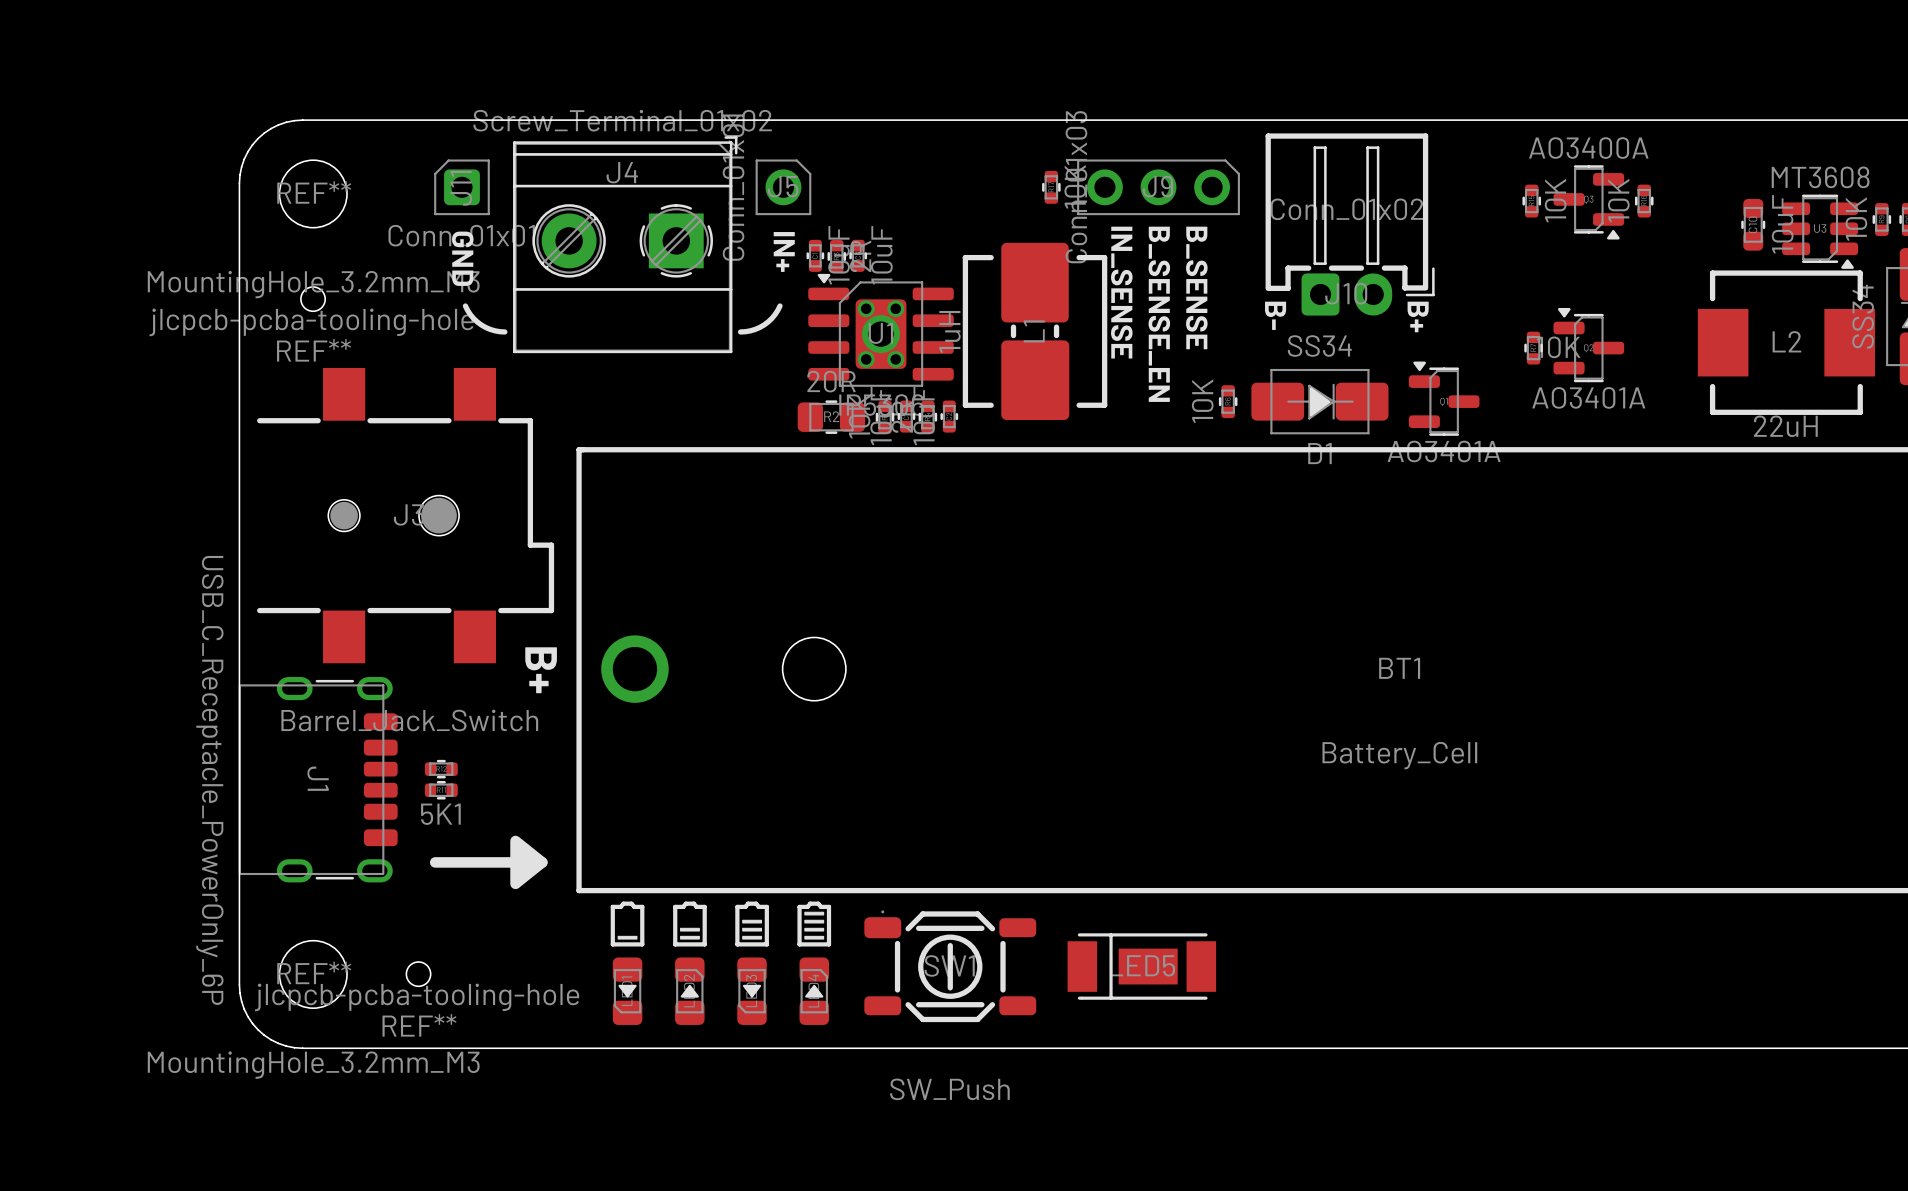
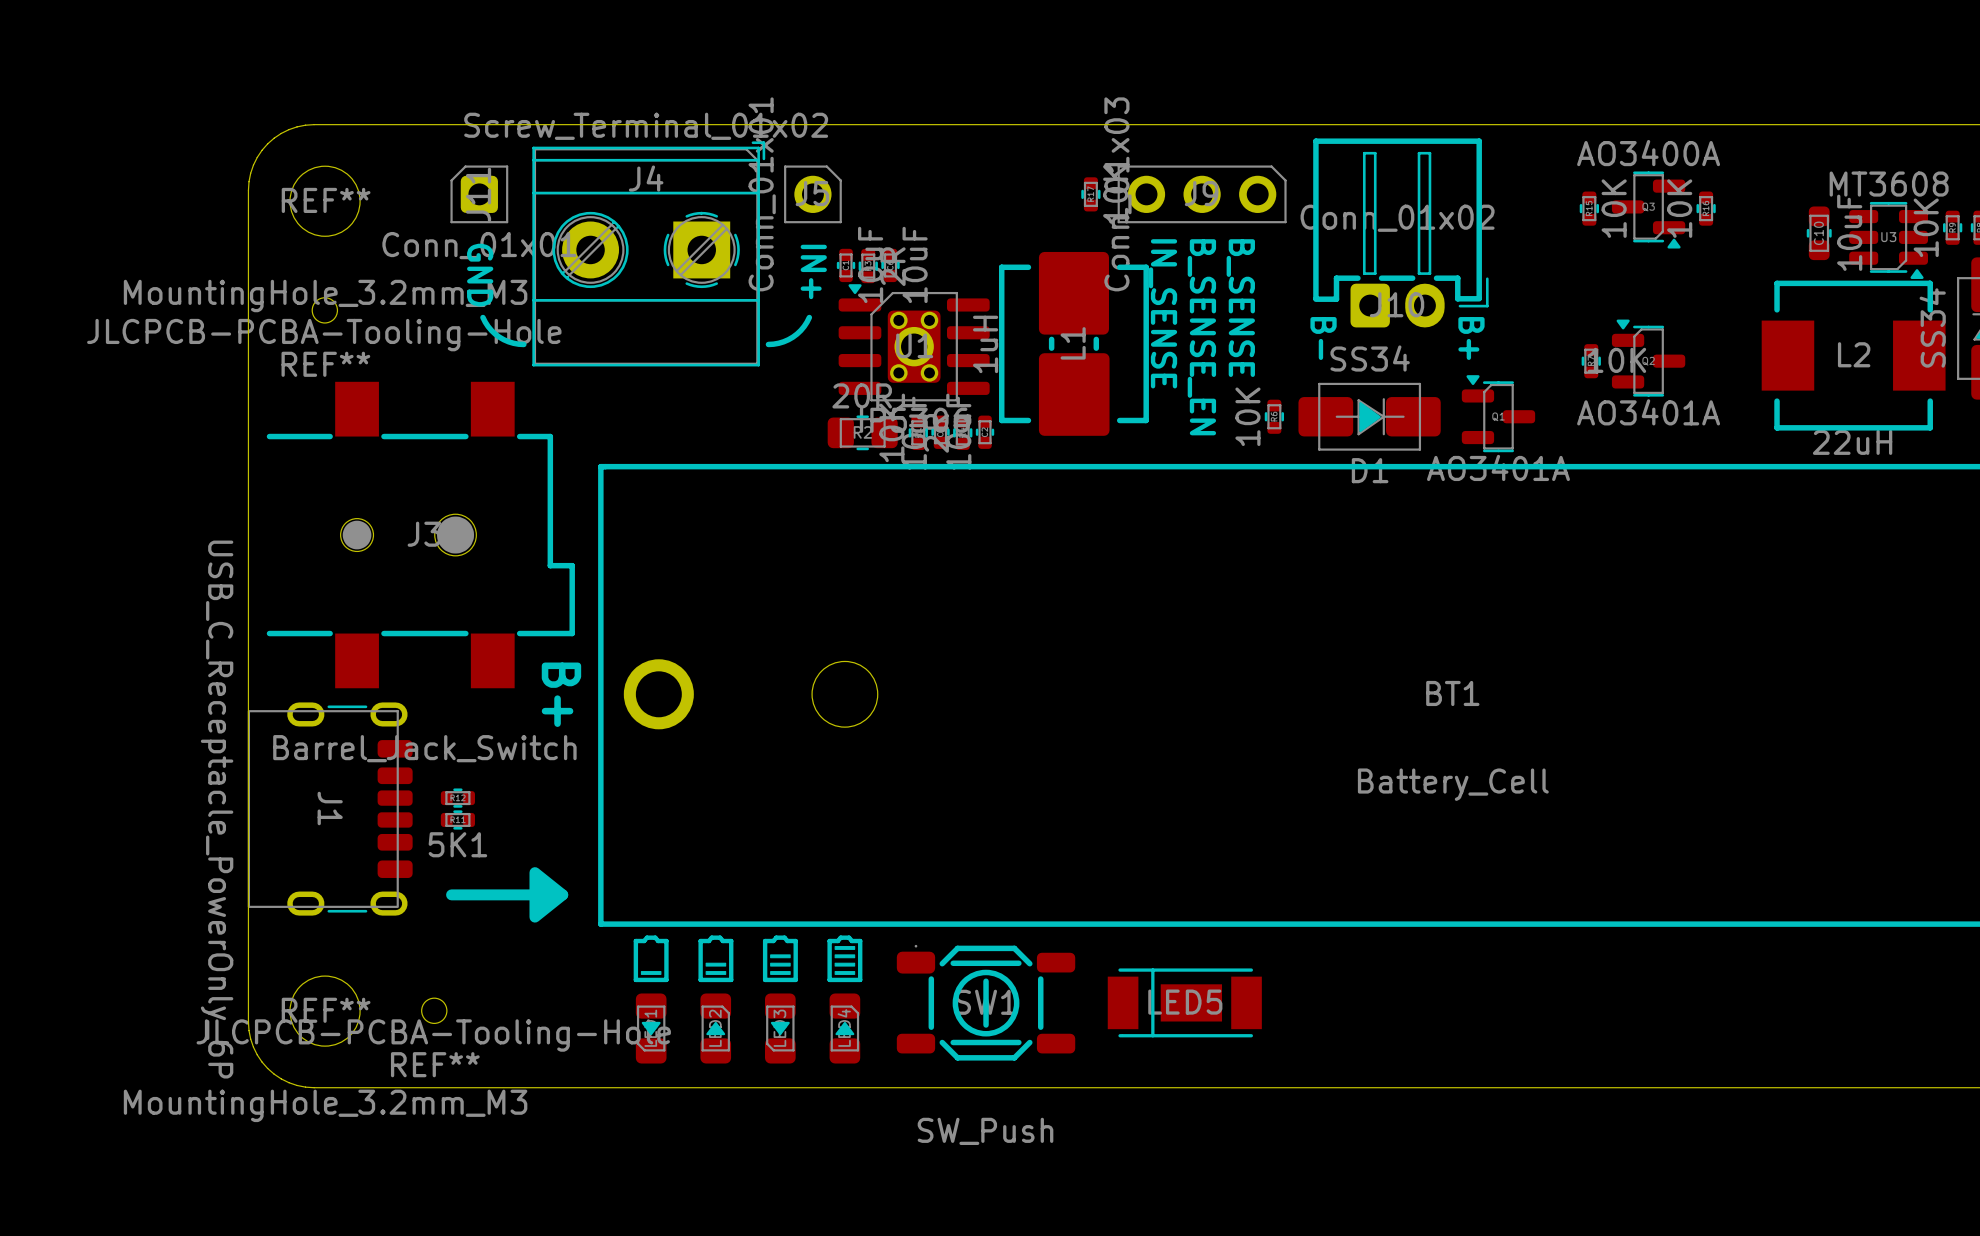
REF** value: jlcpcb-pcba-tooling-hole (311, 322) -> JLCPCB-PCBA-Tooling-Hole (324, 335)
REF** value: jlcpcb-pcba-tooling-hole (417, 997) -> JLCPCB-PCBA-Tooling-Hole (433, 1035)

